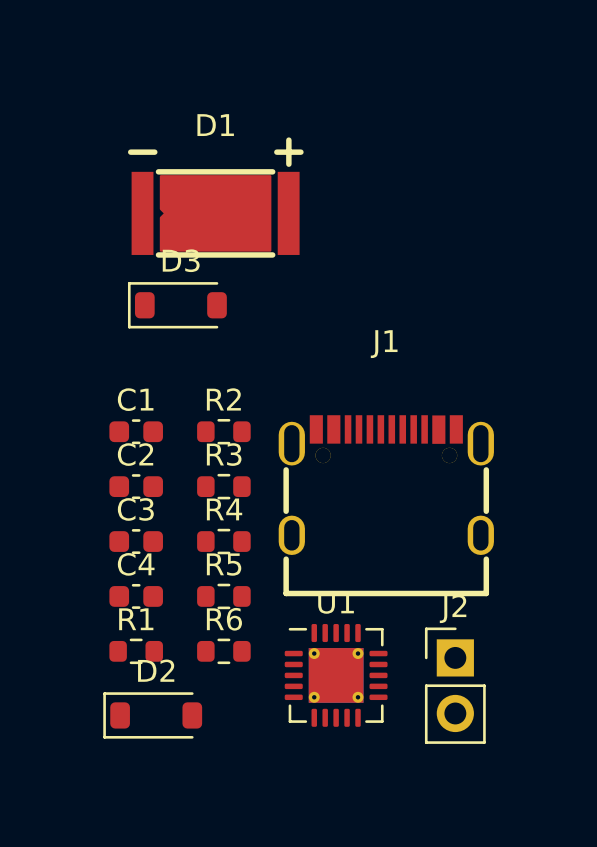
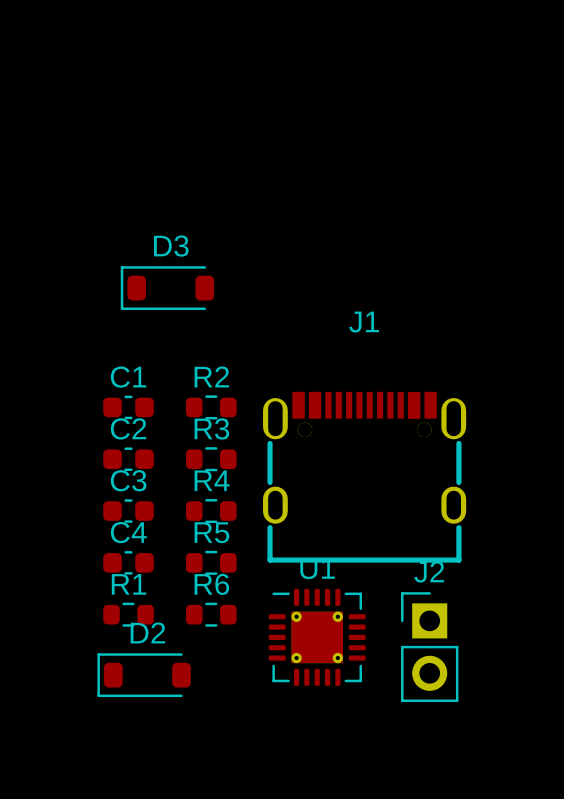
D1: (215, 197) -> none

